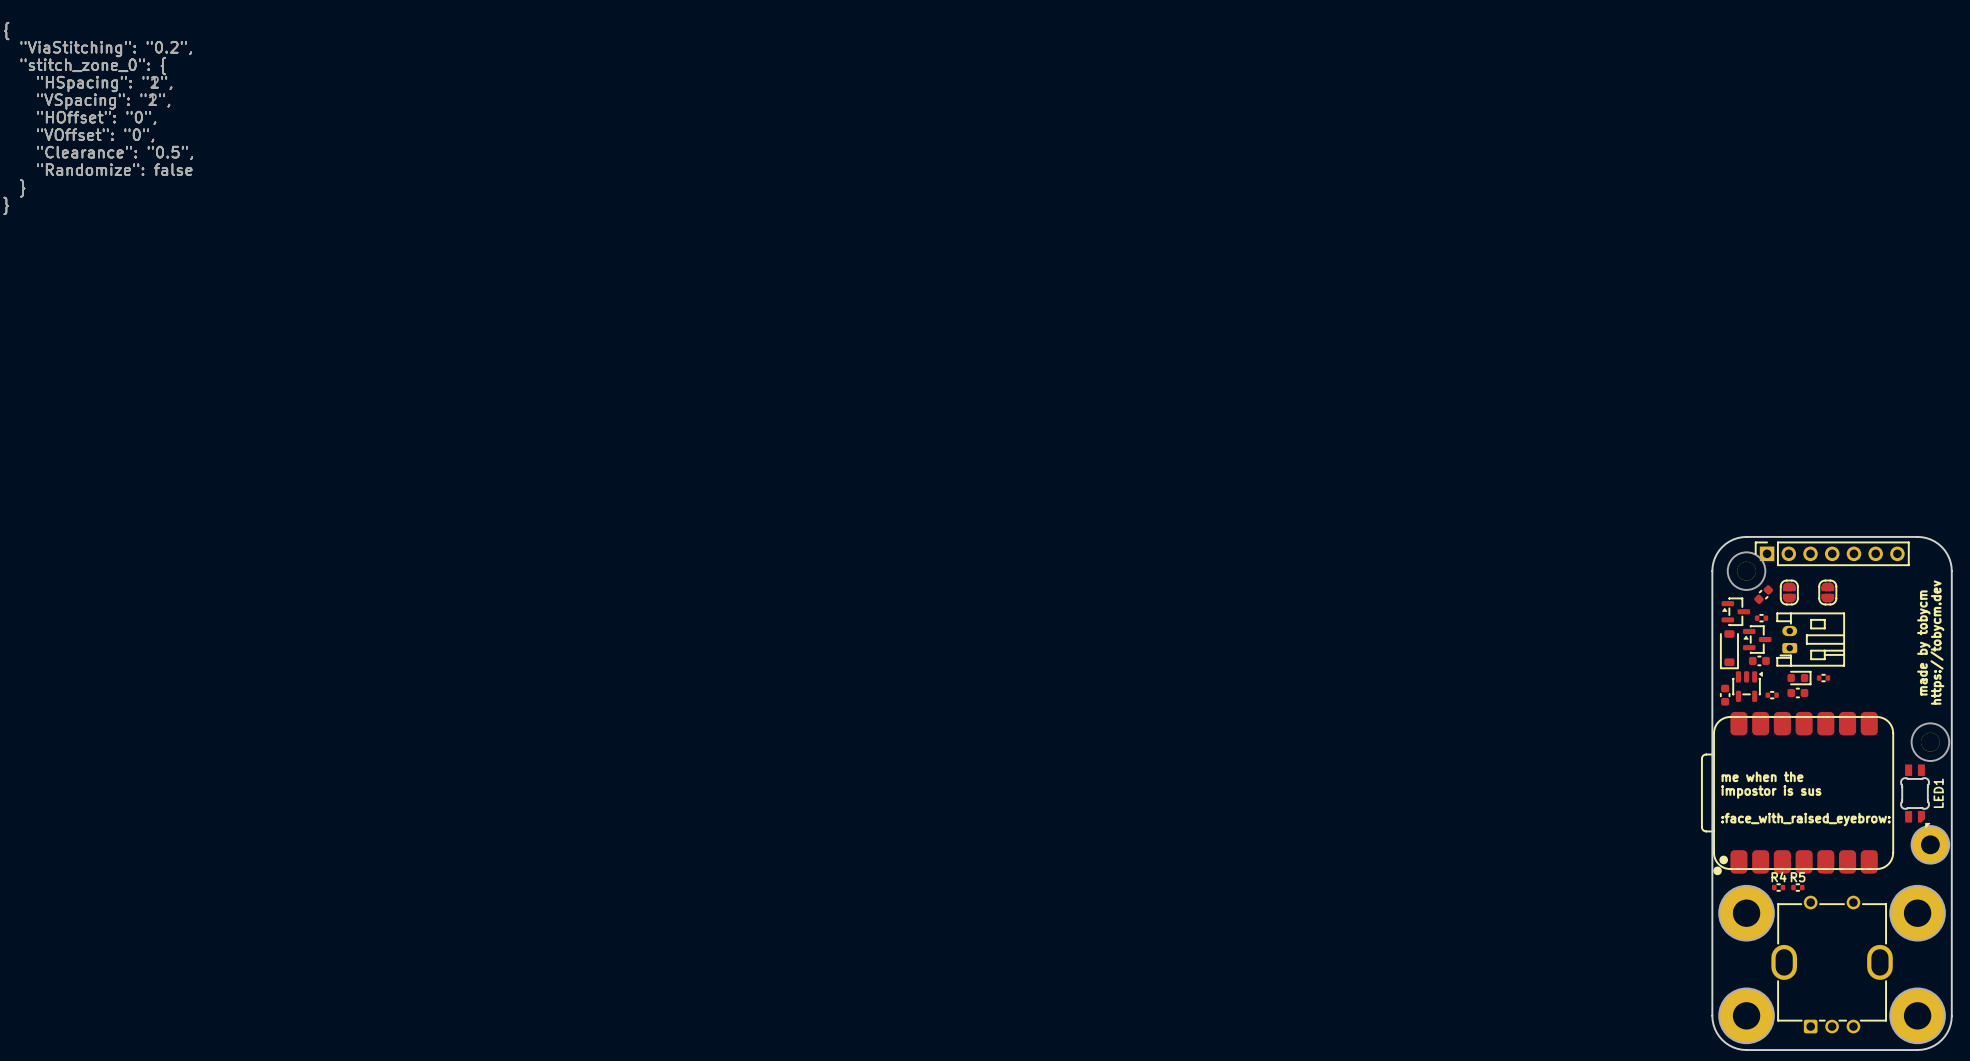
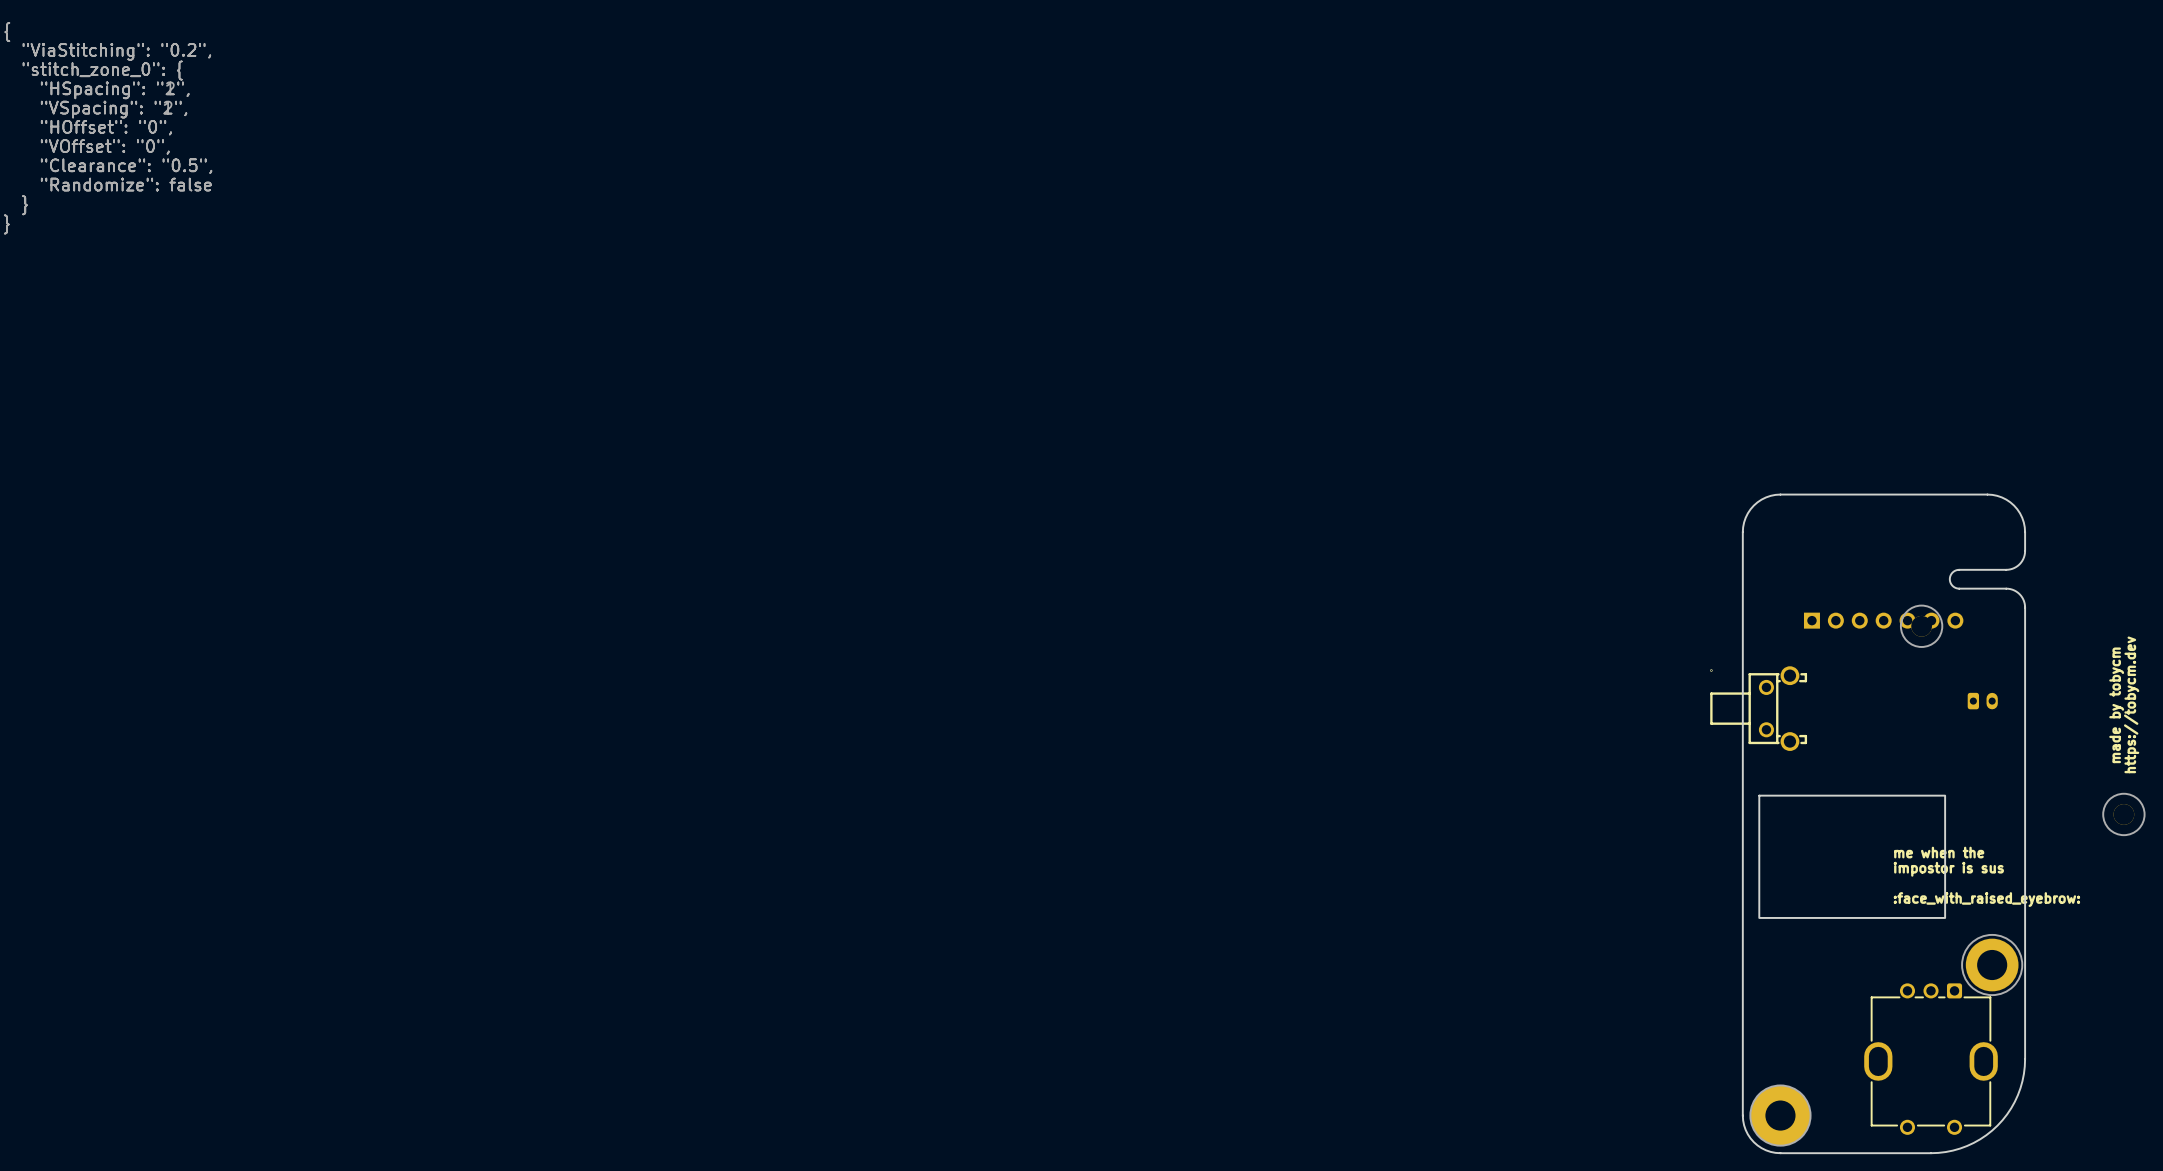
board edge: (1780, 536) (1746, 536) (1733, 539) (1719, 550) (1712, 566) (1712, 1020) (1716, 1032) (1725, 1042) (1733, 1047) (1746, 1050) -> (1959, 588) (1952, 585) (1949, 580) (1951, 574) (1955, 570) (2008, 569) (2016, 566) (2023, 559) (2025, 551) (2023, 522) (2017, 509) (2006, 499) (1987, 494) (1775, 494) (1766, 497) (1753, 505) (1744, 522) (1744, 1125) (1753, 1142) (1766, 1150) (1775, 1152) (1921, 1153)
board edge: (1823, 536) (1926, 538) (1941, 546) (1950, 562) (1951, 1020) (1949, 1028) (1941, 1040) (1934, 1045) (1922, 1049) (1755, 1050) -> (2006, 588) (2019, 594) (2025, 607) (2023, 1073) (2014, 1101) (2002, 1120) (1992, 1130) (1980, 1139) (1960, 1148) (1931, 1153)
part side: top (1832, 553) -> bottom (1883, 620)
part: (1789, 592) -> none
part: (1827, 592) -> none
part: (1763, 594) -> none
part: (1735, 611) -> none
part: (1761, 618) -> none
part: (1757, 639) -> none
part side: top (1810, 639) -> bottom (1982, 701)
part: none -> (1758, 708)
part: (1729, 649) -> none
part: (1759, 660) -> none
part: (1799, 678) -> none
part: (1823, 678) -> none
part: (1747, 686) -> none
part: (1797, 693) -> none
part: (1725, 695) -> none
part: (1772, 695) -> none
part: none -> (1852, 856)
part: (1797, 793) -> none
LED1: (1915, 796) -> none
part: (1930, 844) -> none
part: none -> (1992, 965)
R4: (1778, 887) -> none
R5: (1797, 887) -> none
part: (1746, 913) -> none
part: (1917, 913) -> none
part rotation: 0° (1832, 964) -> 180° (1931, 1059)
part: none -> (1780, 1115)
part: (1746, 1015) -> none
part: (1917, 1015) -> none

